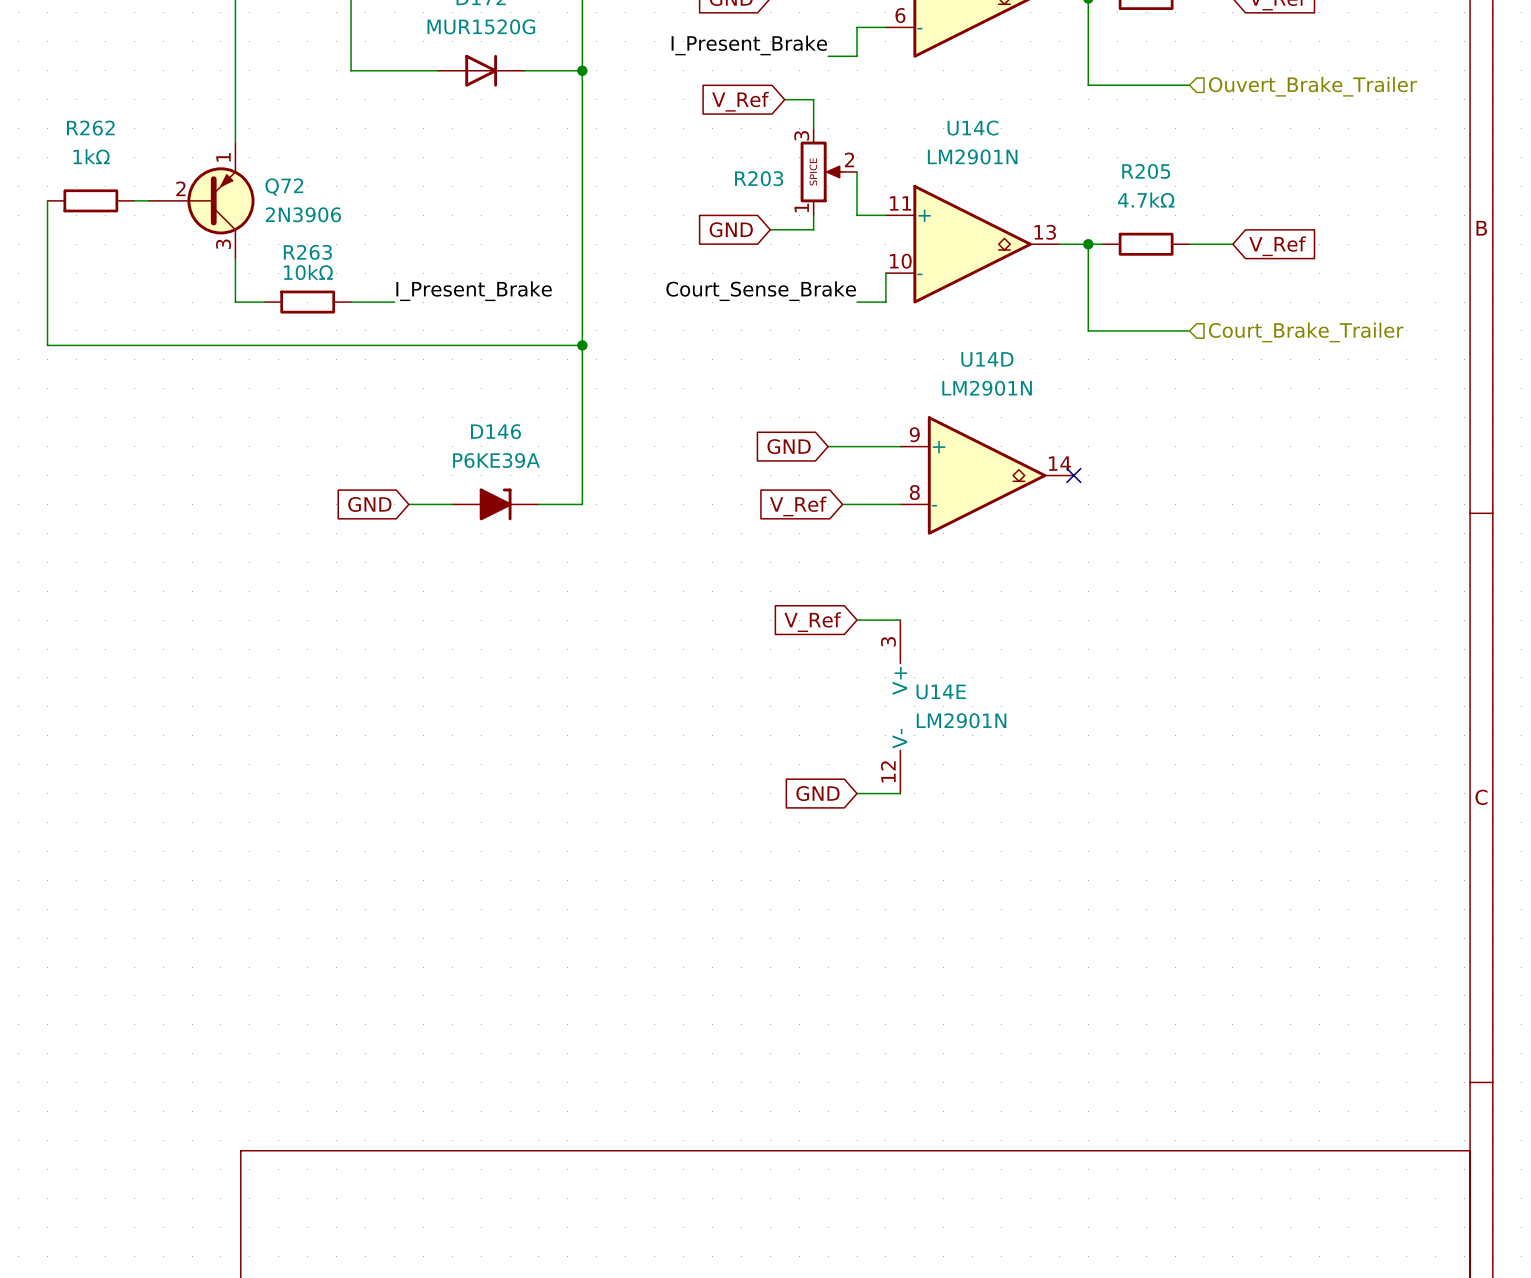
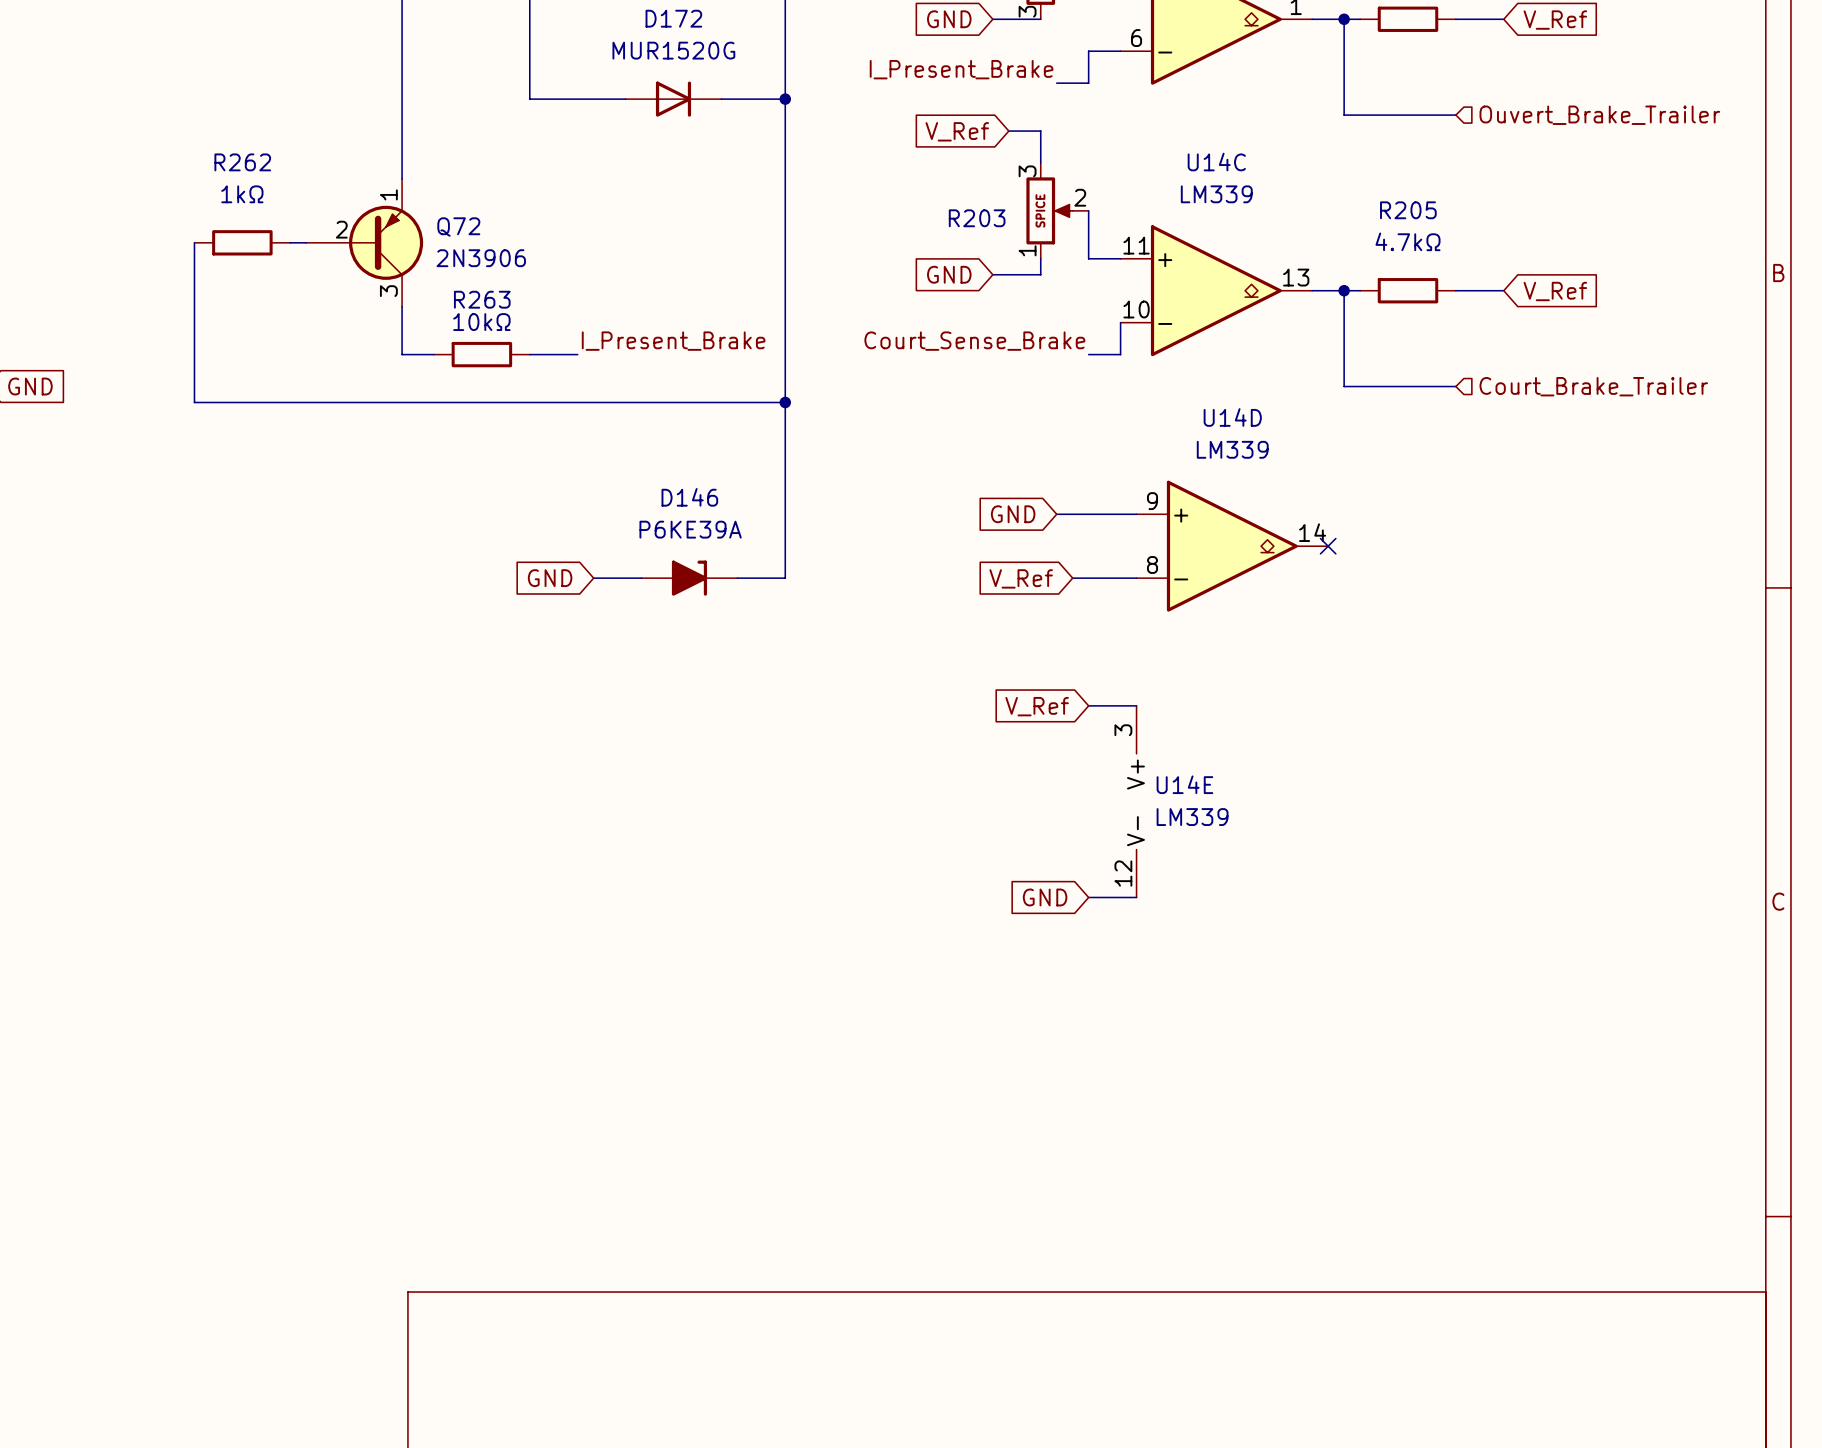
U14C value: LM2901N (972, 156) -> LM339 (1216, 194)
U14D value: LM2901N (987, 388) -> LM339 (1232, 449)
U14E value: LM2901N (961, 720) -> LM339 (1192, 817)

